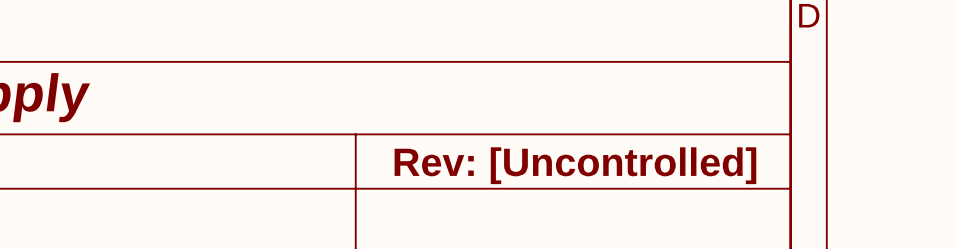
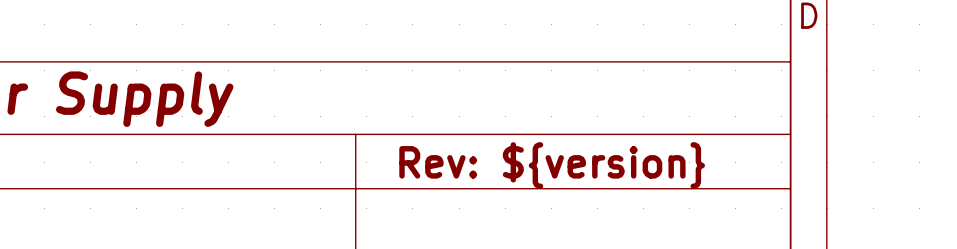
title block: Rev: [Uncontrolled] (575, 165) -> Rev: ${version} (552, 165)

